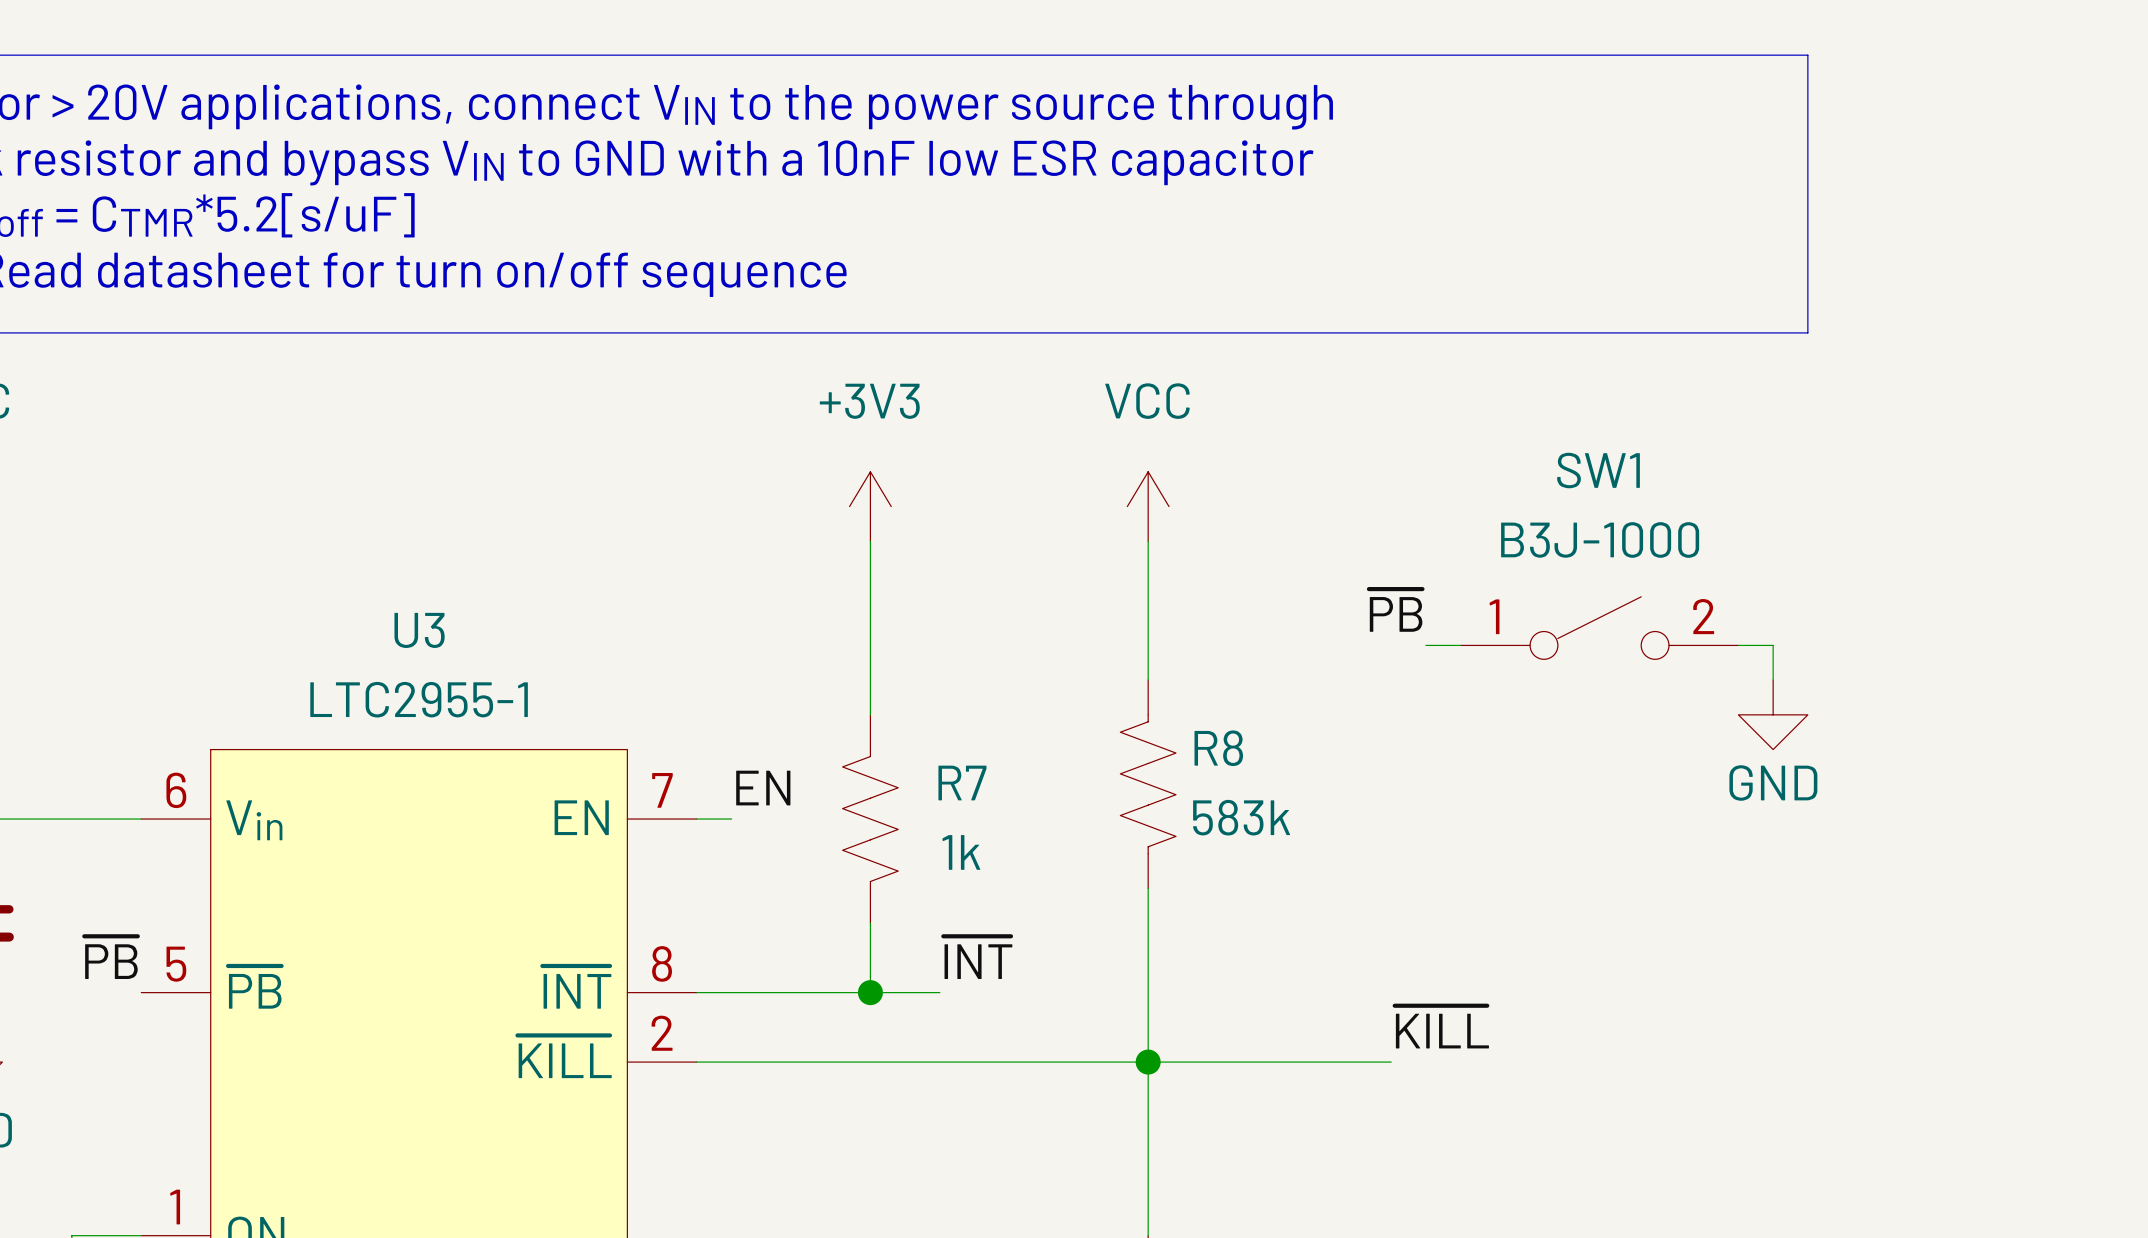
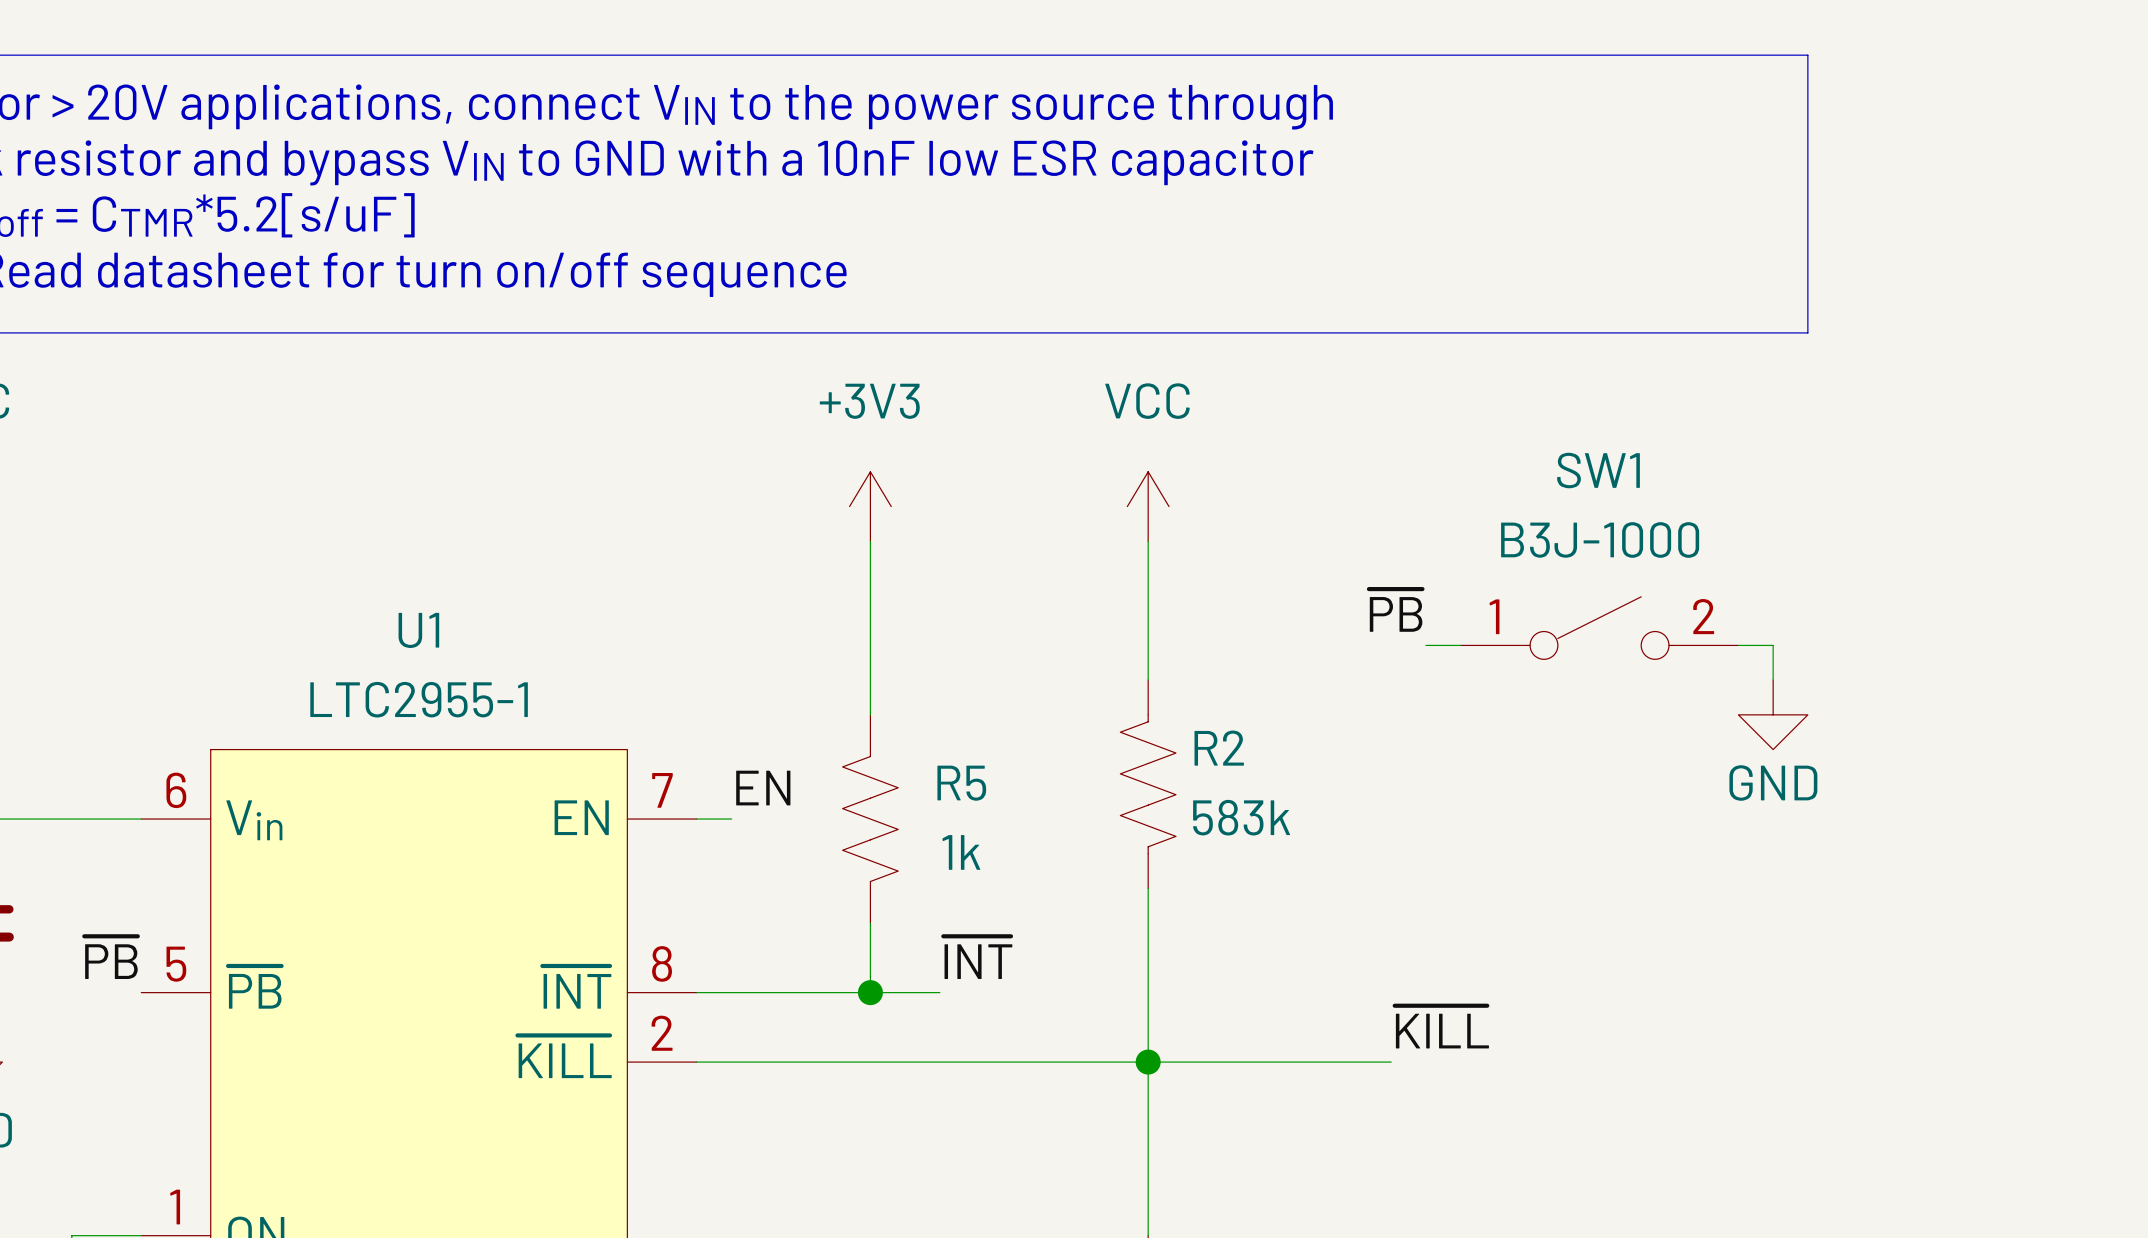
U3 name: U3 (419, 630) -> U1 (418, 630)
R8 name: R8 (1218, 748) -> R2 (1219, 748)
R7 name: R7 (962, 783) -> R5 (961, 783)

